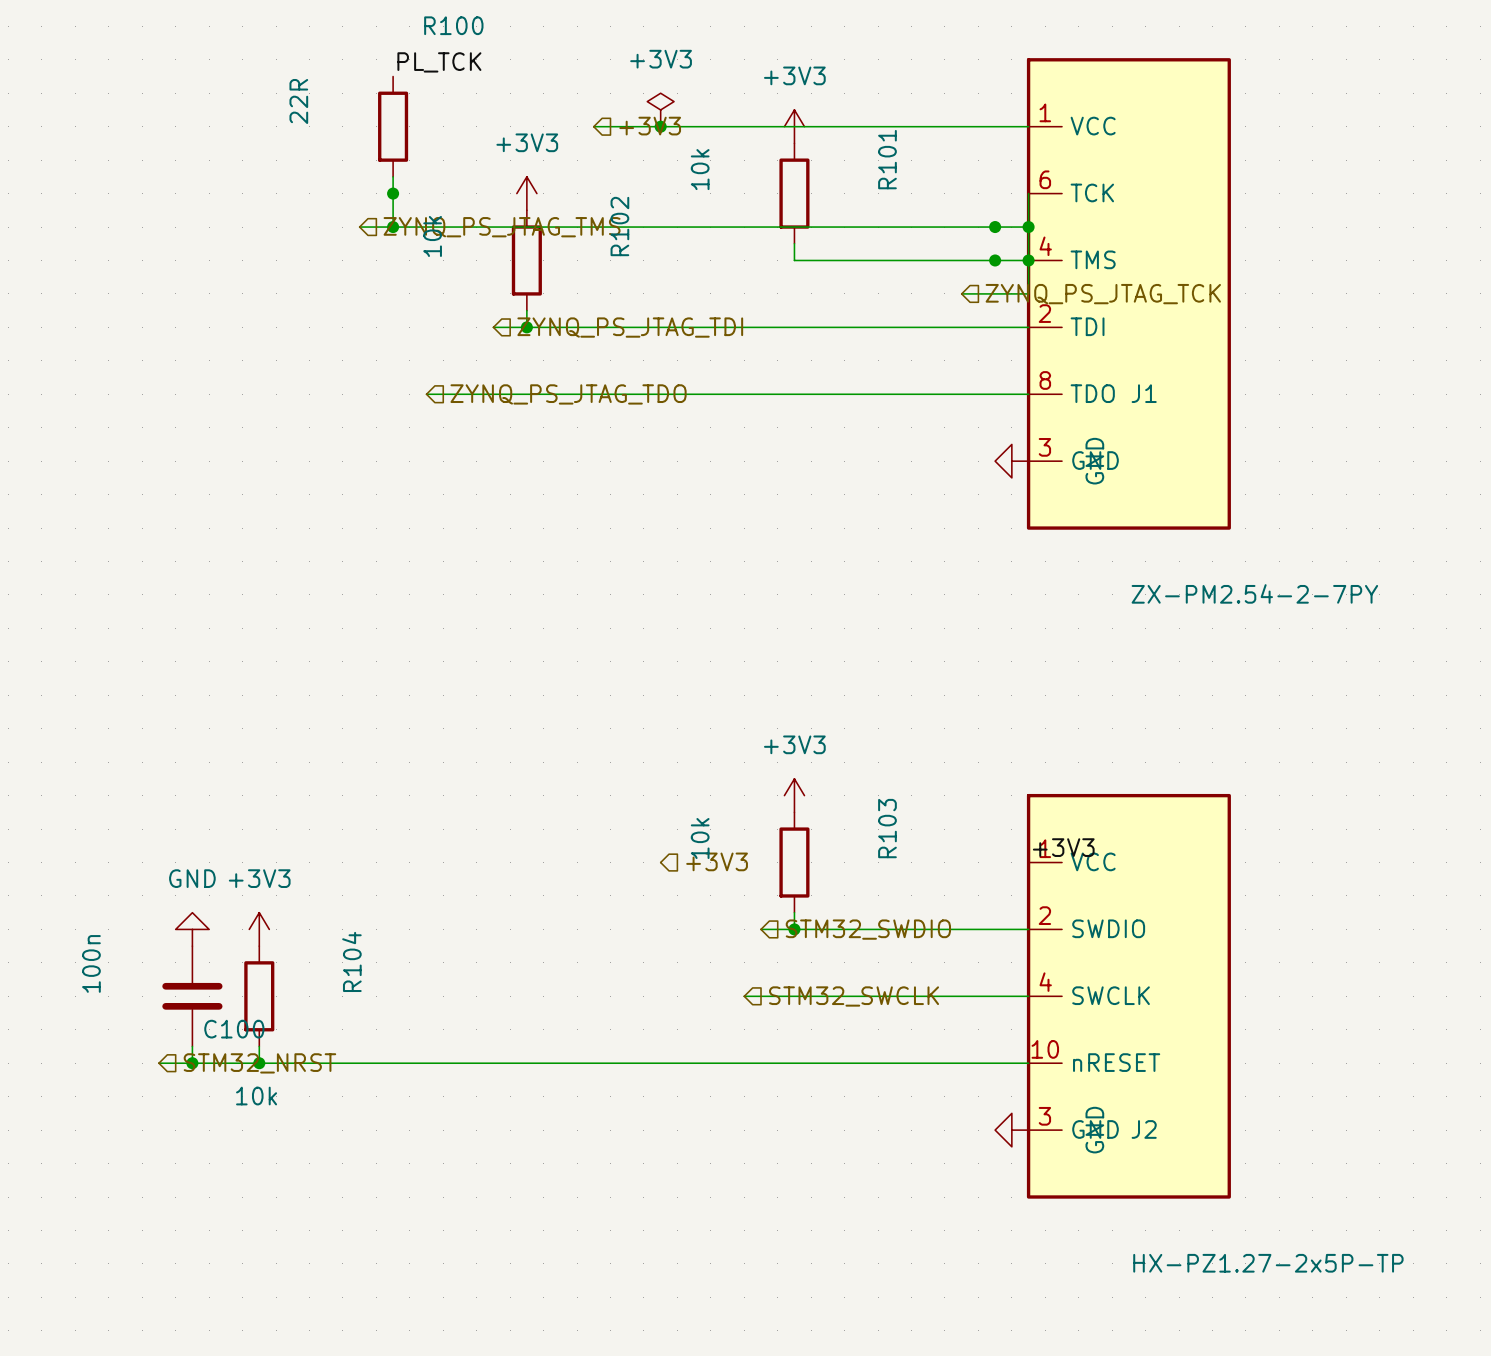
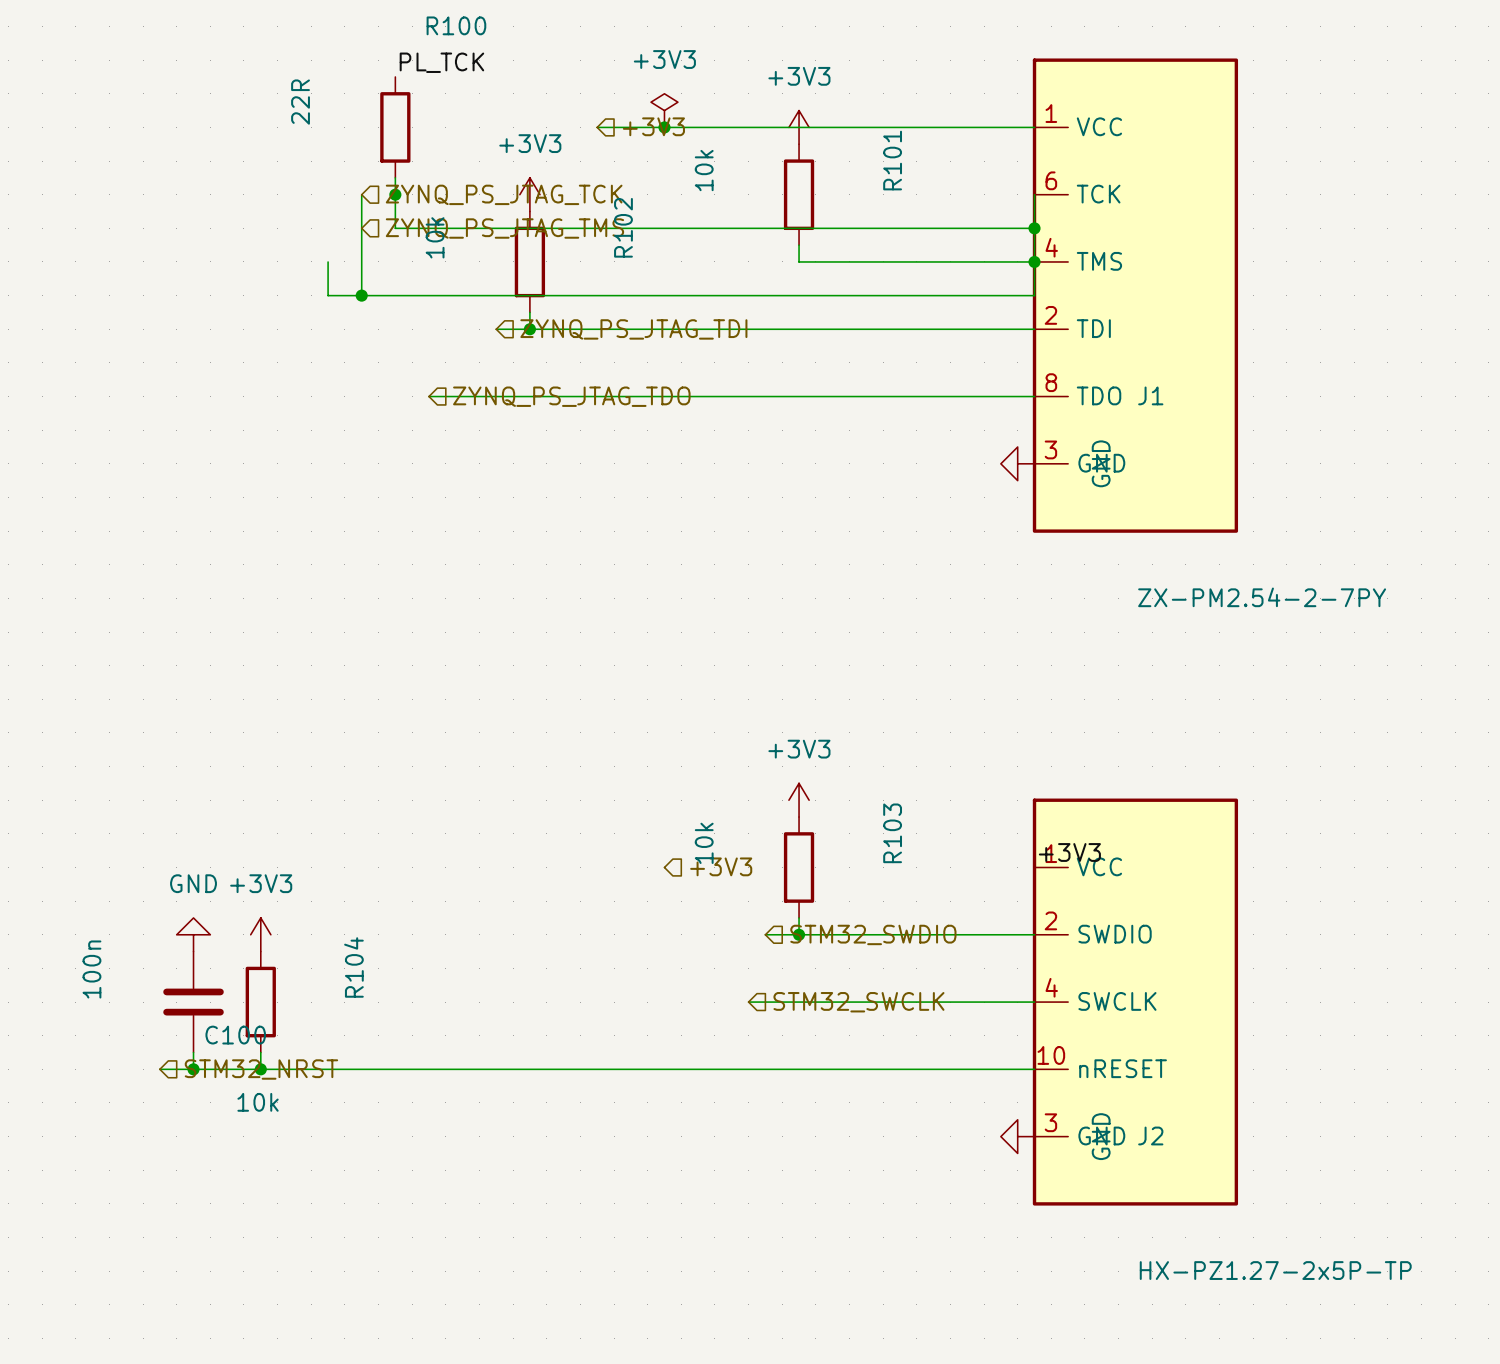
wire: none -> (361, 194) (361, 295)
hierarchical label: none -> ZYNQ_PS_JTAG_TCK (504, 194)
wire: (359, 227) (393, 227) -> none
junction position: (393, 227) -> (361, 295)
junction: (995, 227) -> none
wire: none -> (328, 261) (328, 295) (967, 295)
junction: (995, 260) -> none
hierarchical label: ZYNQ_PS_JTAG_TCK (1103, 294) -> none

